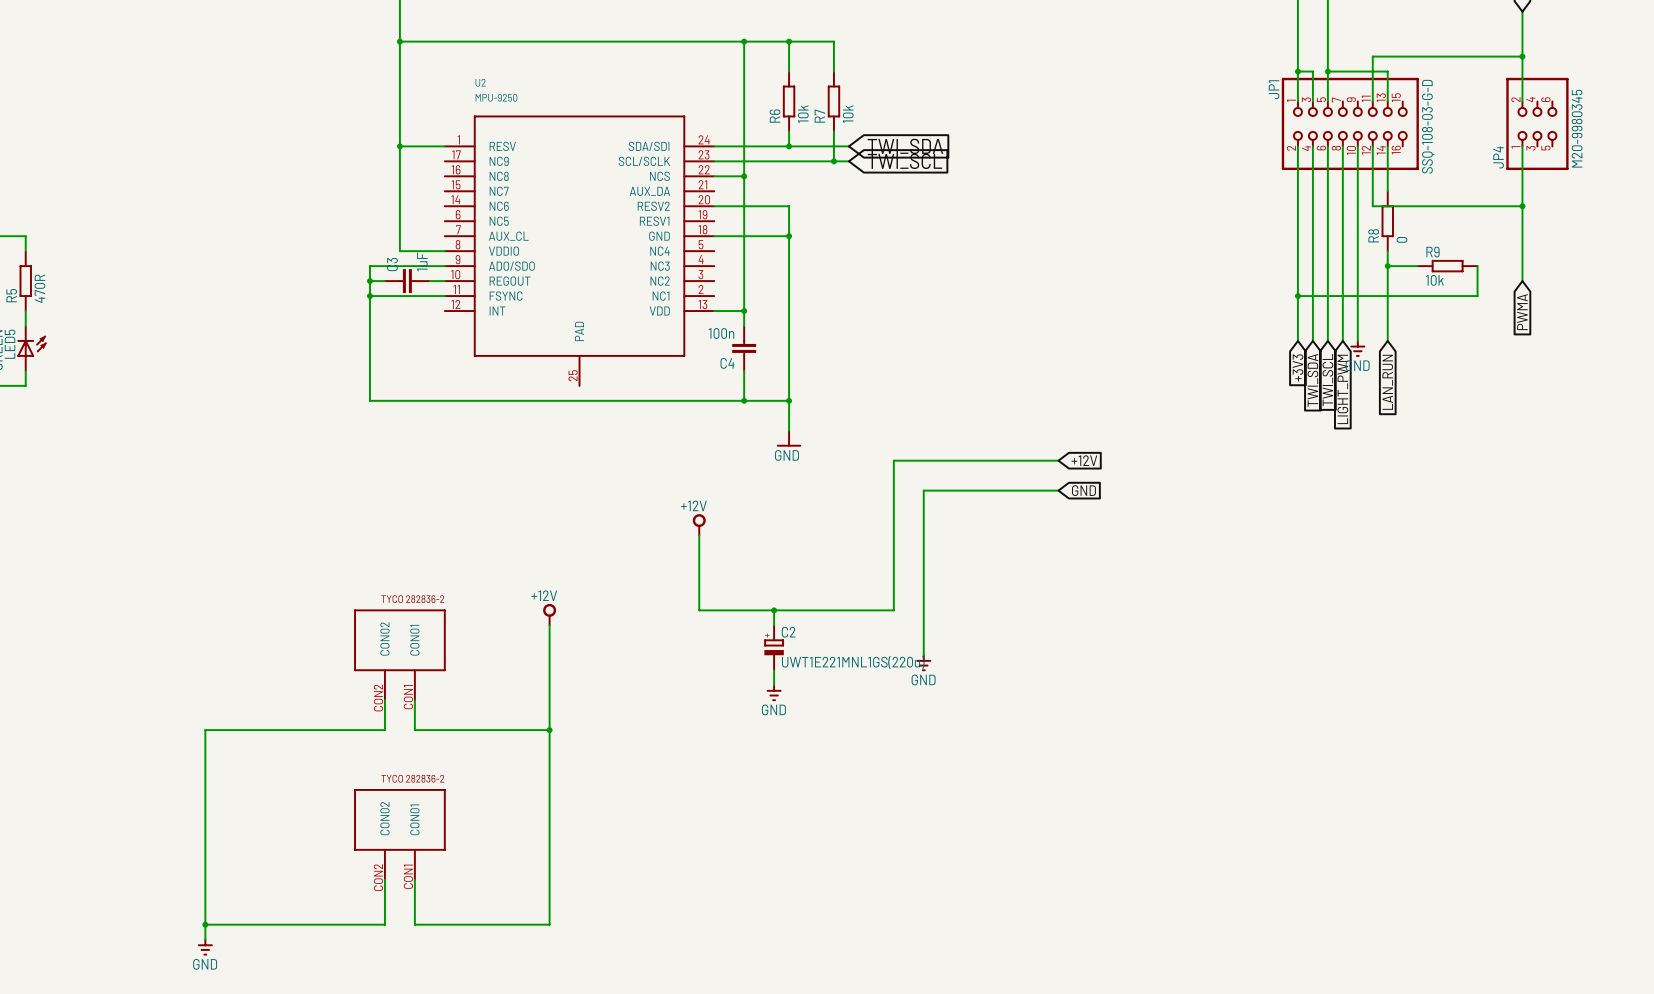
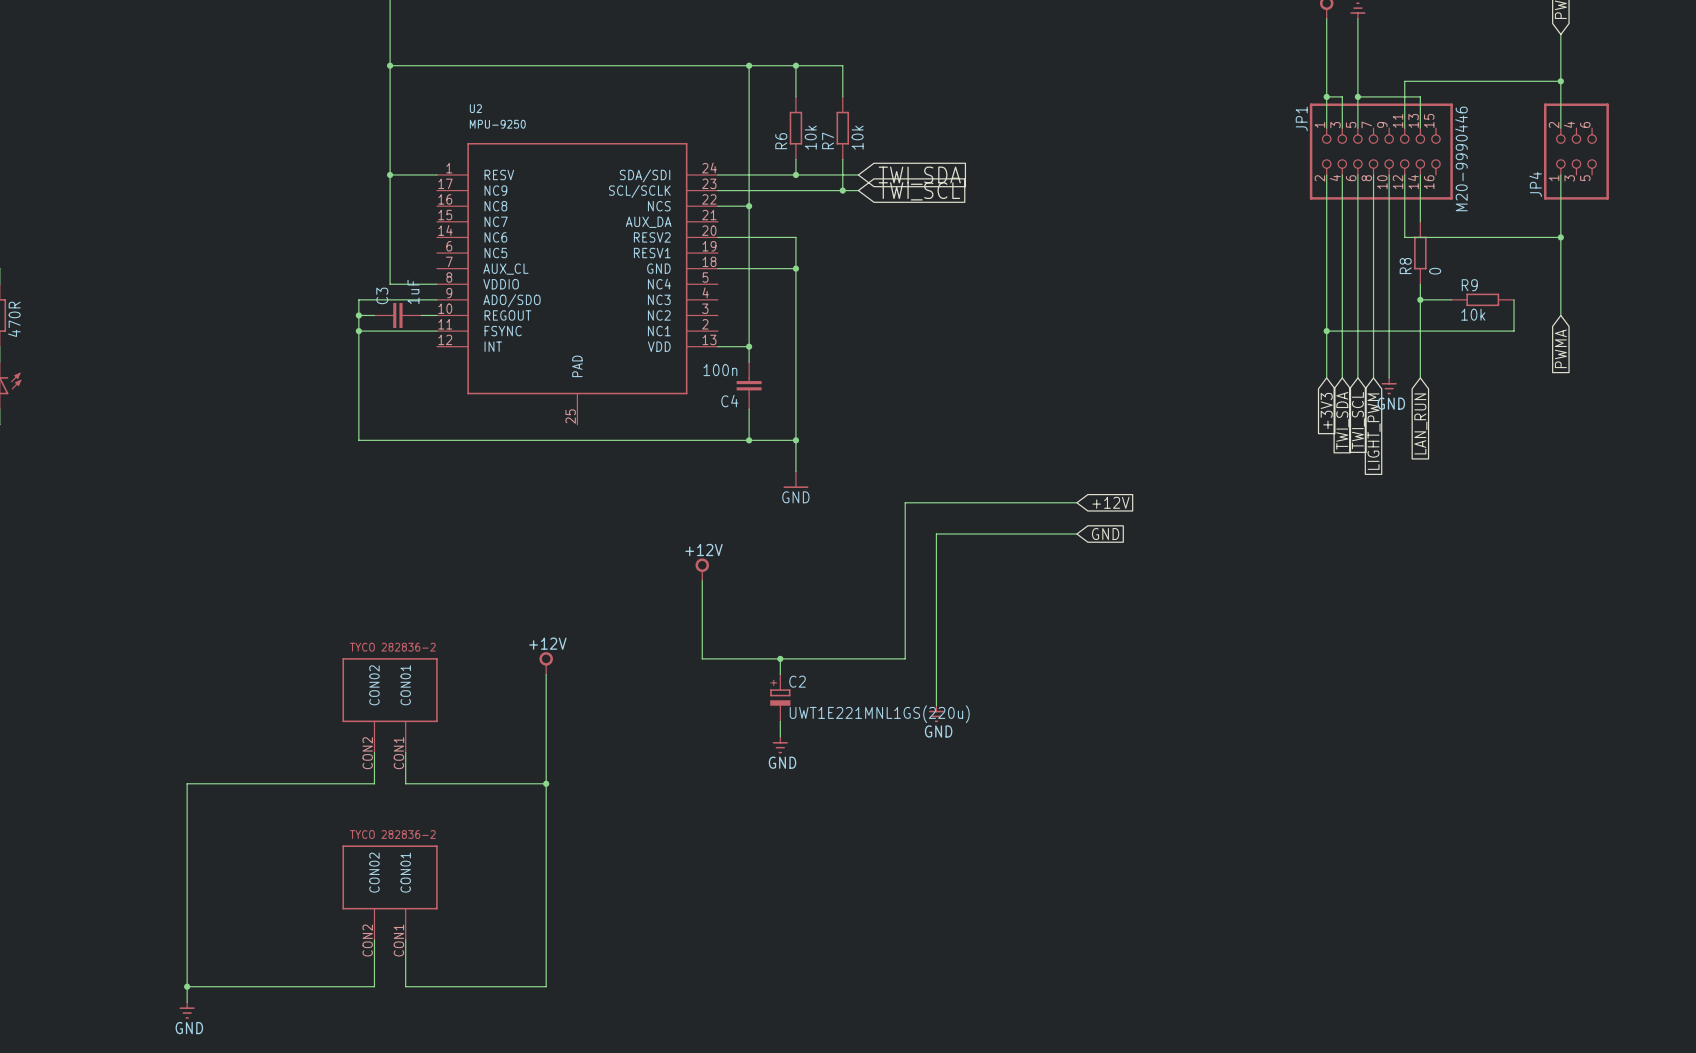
JP1 value: SSQ-108-03-G-D (1428, 126) -> M20-9990446 (1461, 158)
JP4 value: M20-9980345 (1577, 128) -> none

